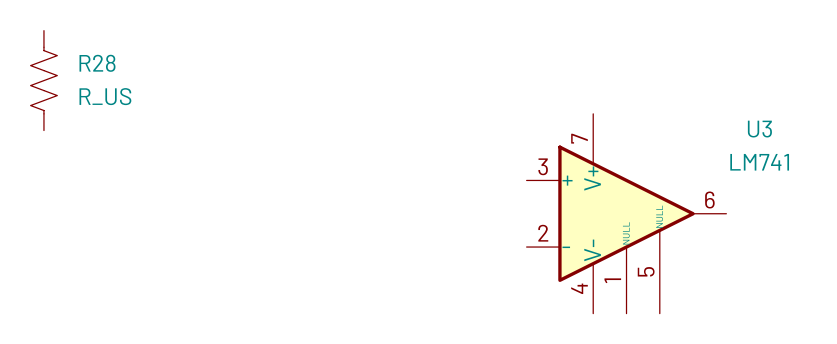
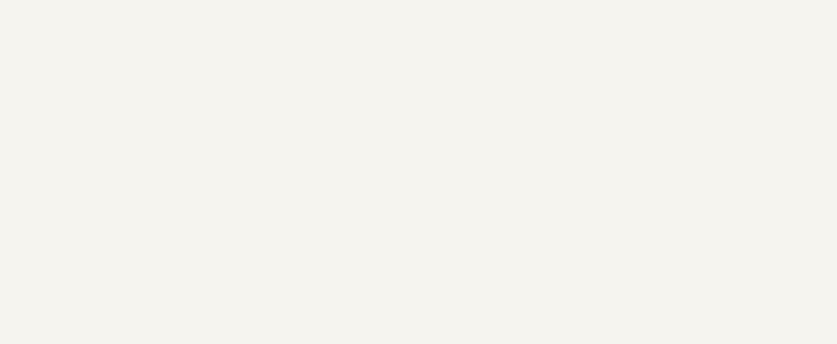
R28: R_US (43, 80) -> none
U3: LM741 (626, 213) -> none

